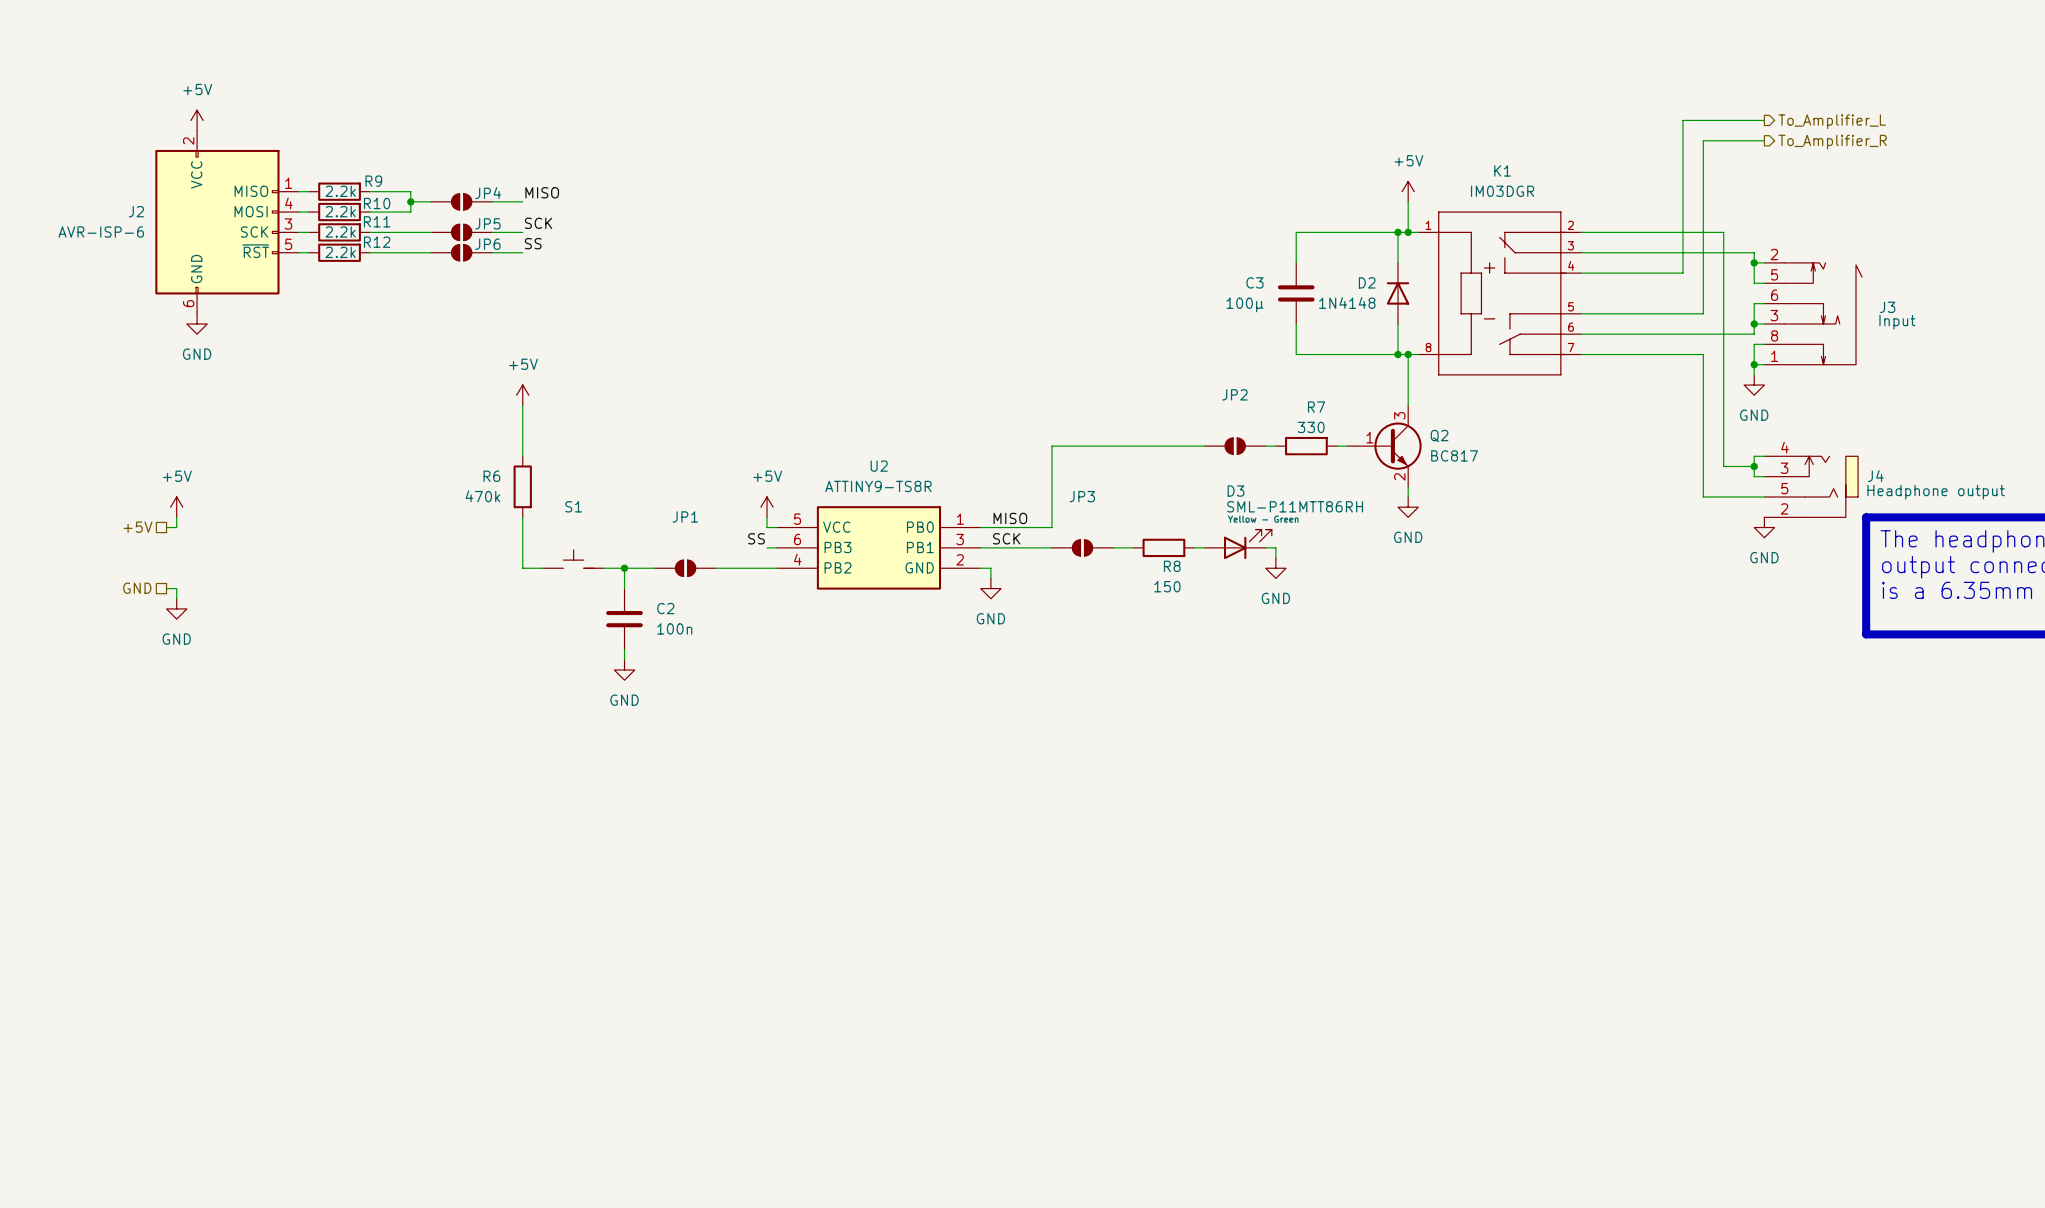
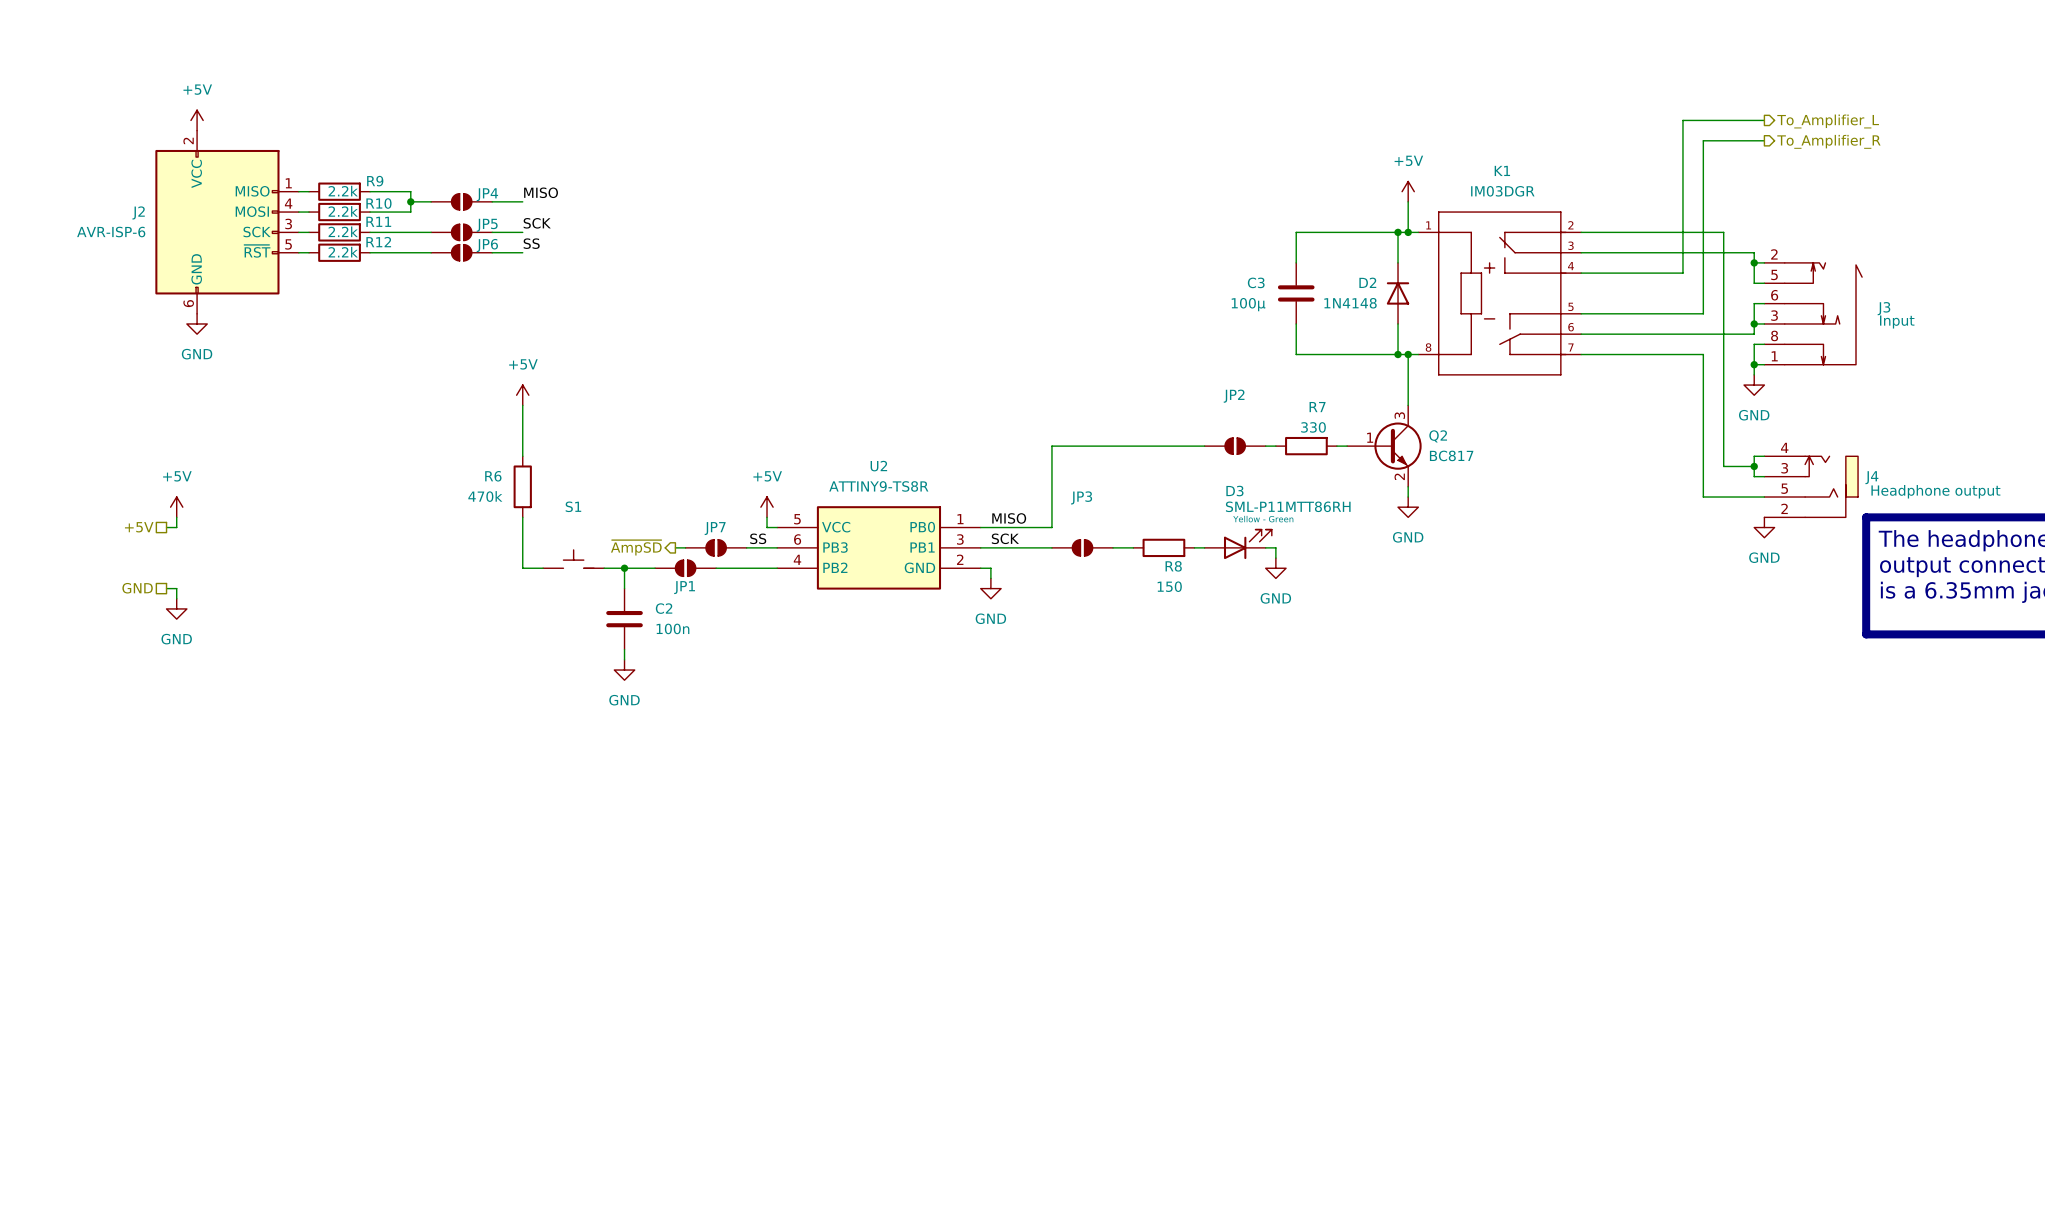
JP1 name position: JP1 (685, 516) -> JP1 (684, 587)
wire: none -> (675, 547) (685, 547)
JP7: none -> (716, 547)
wire: none -> (746, 547) (767, 547)
hierarchical label: none -> ~{AmpSD} (636, 547)

